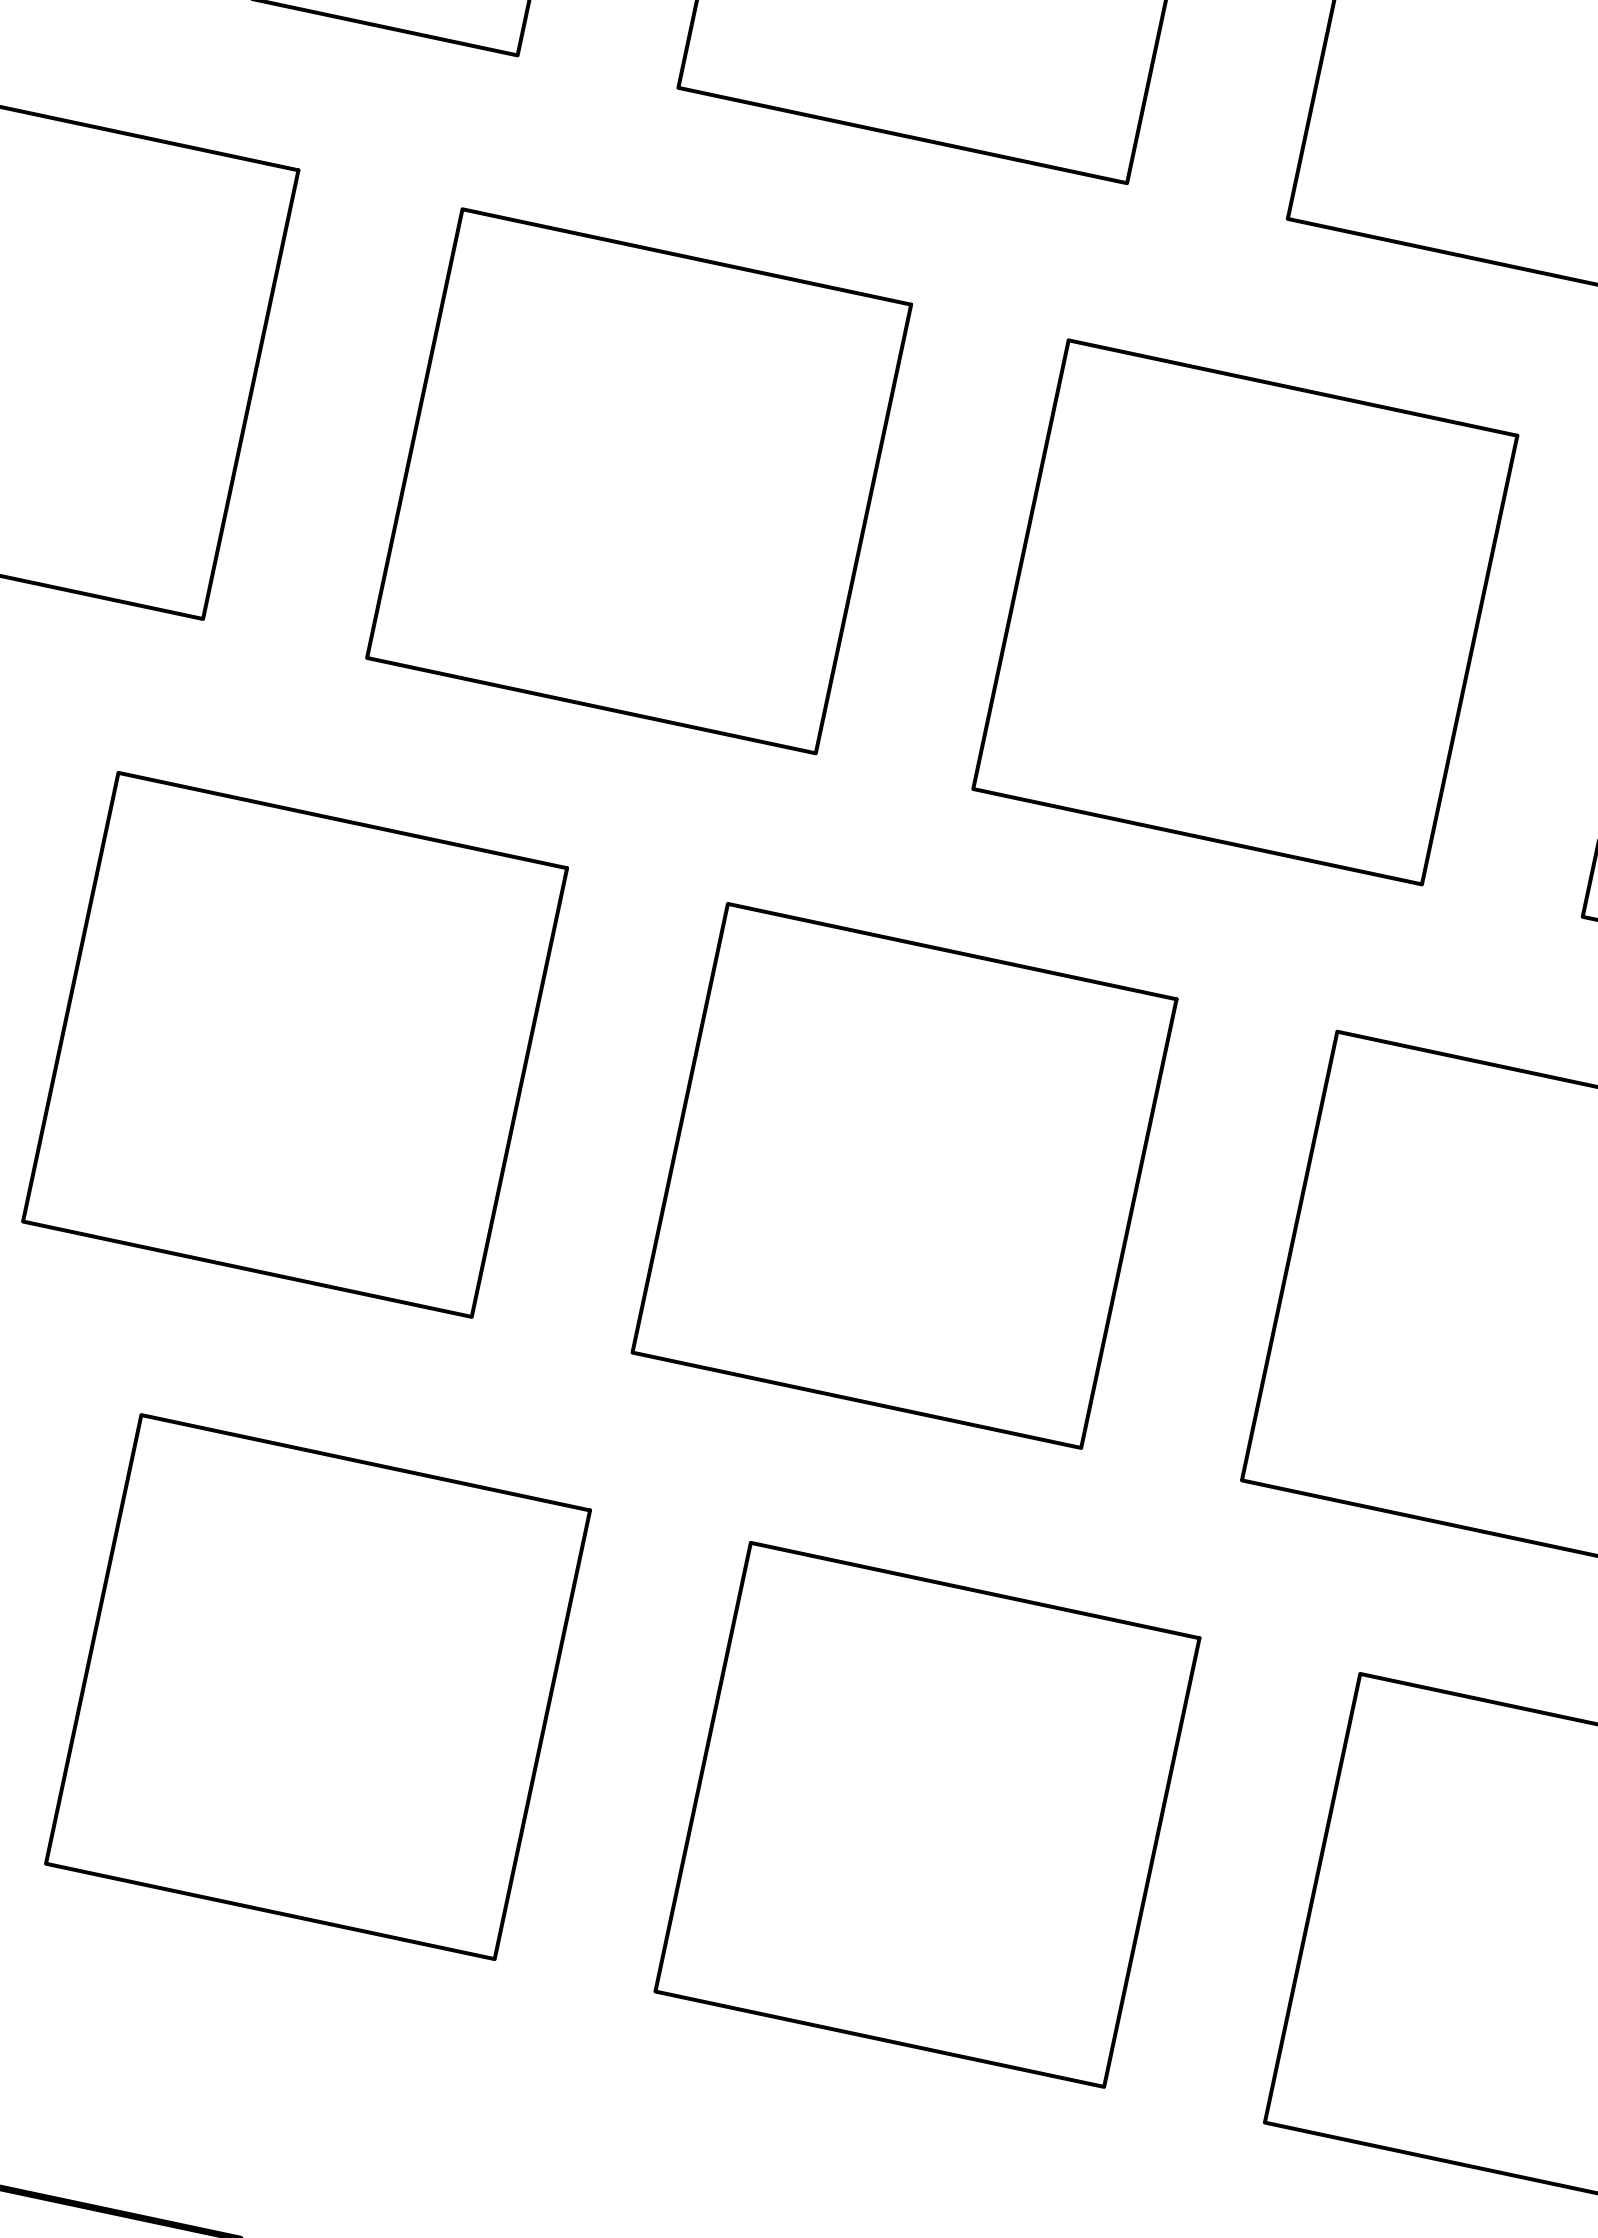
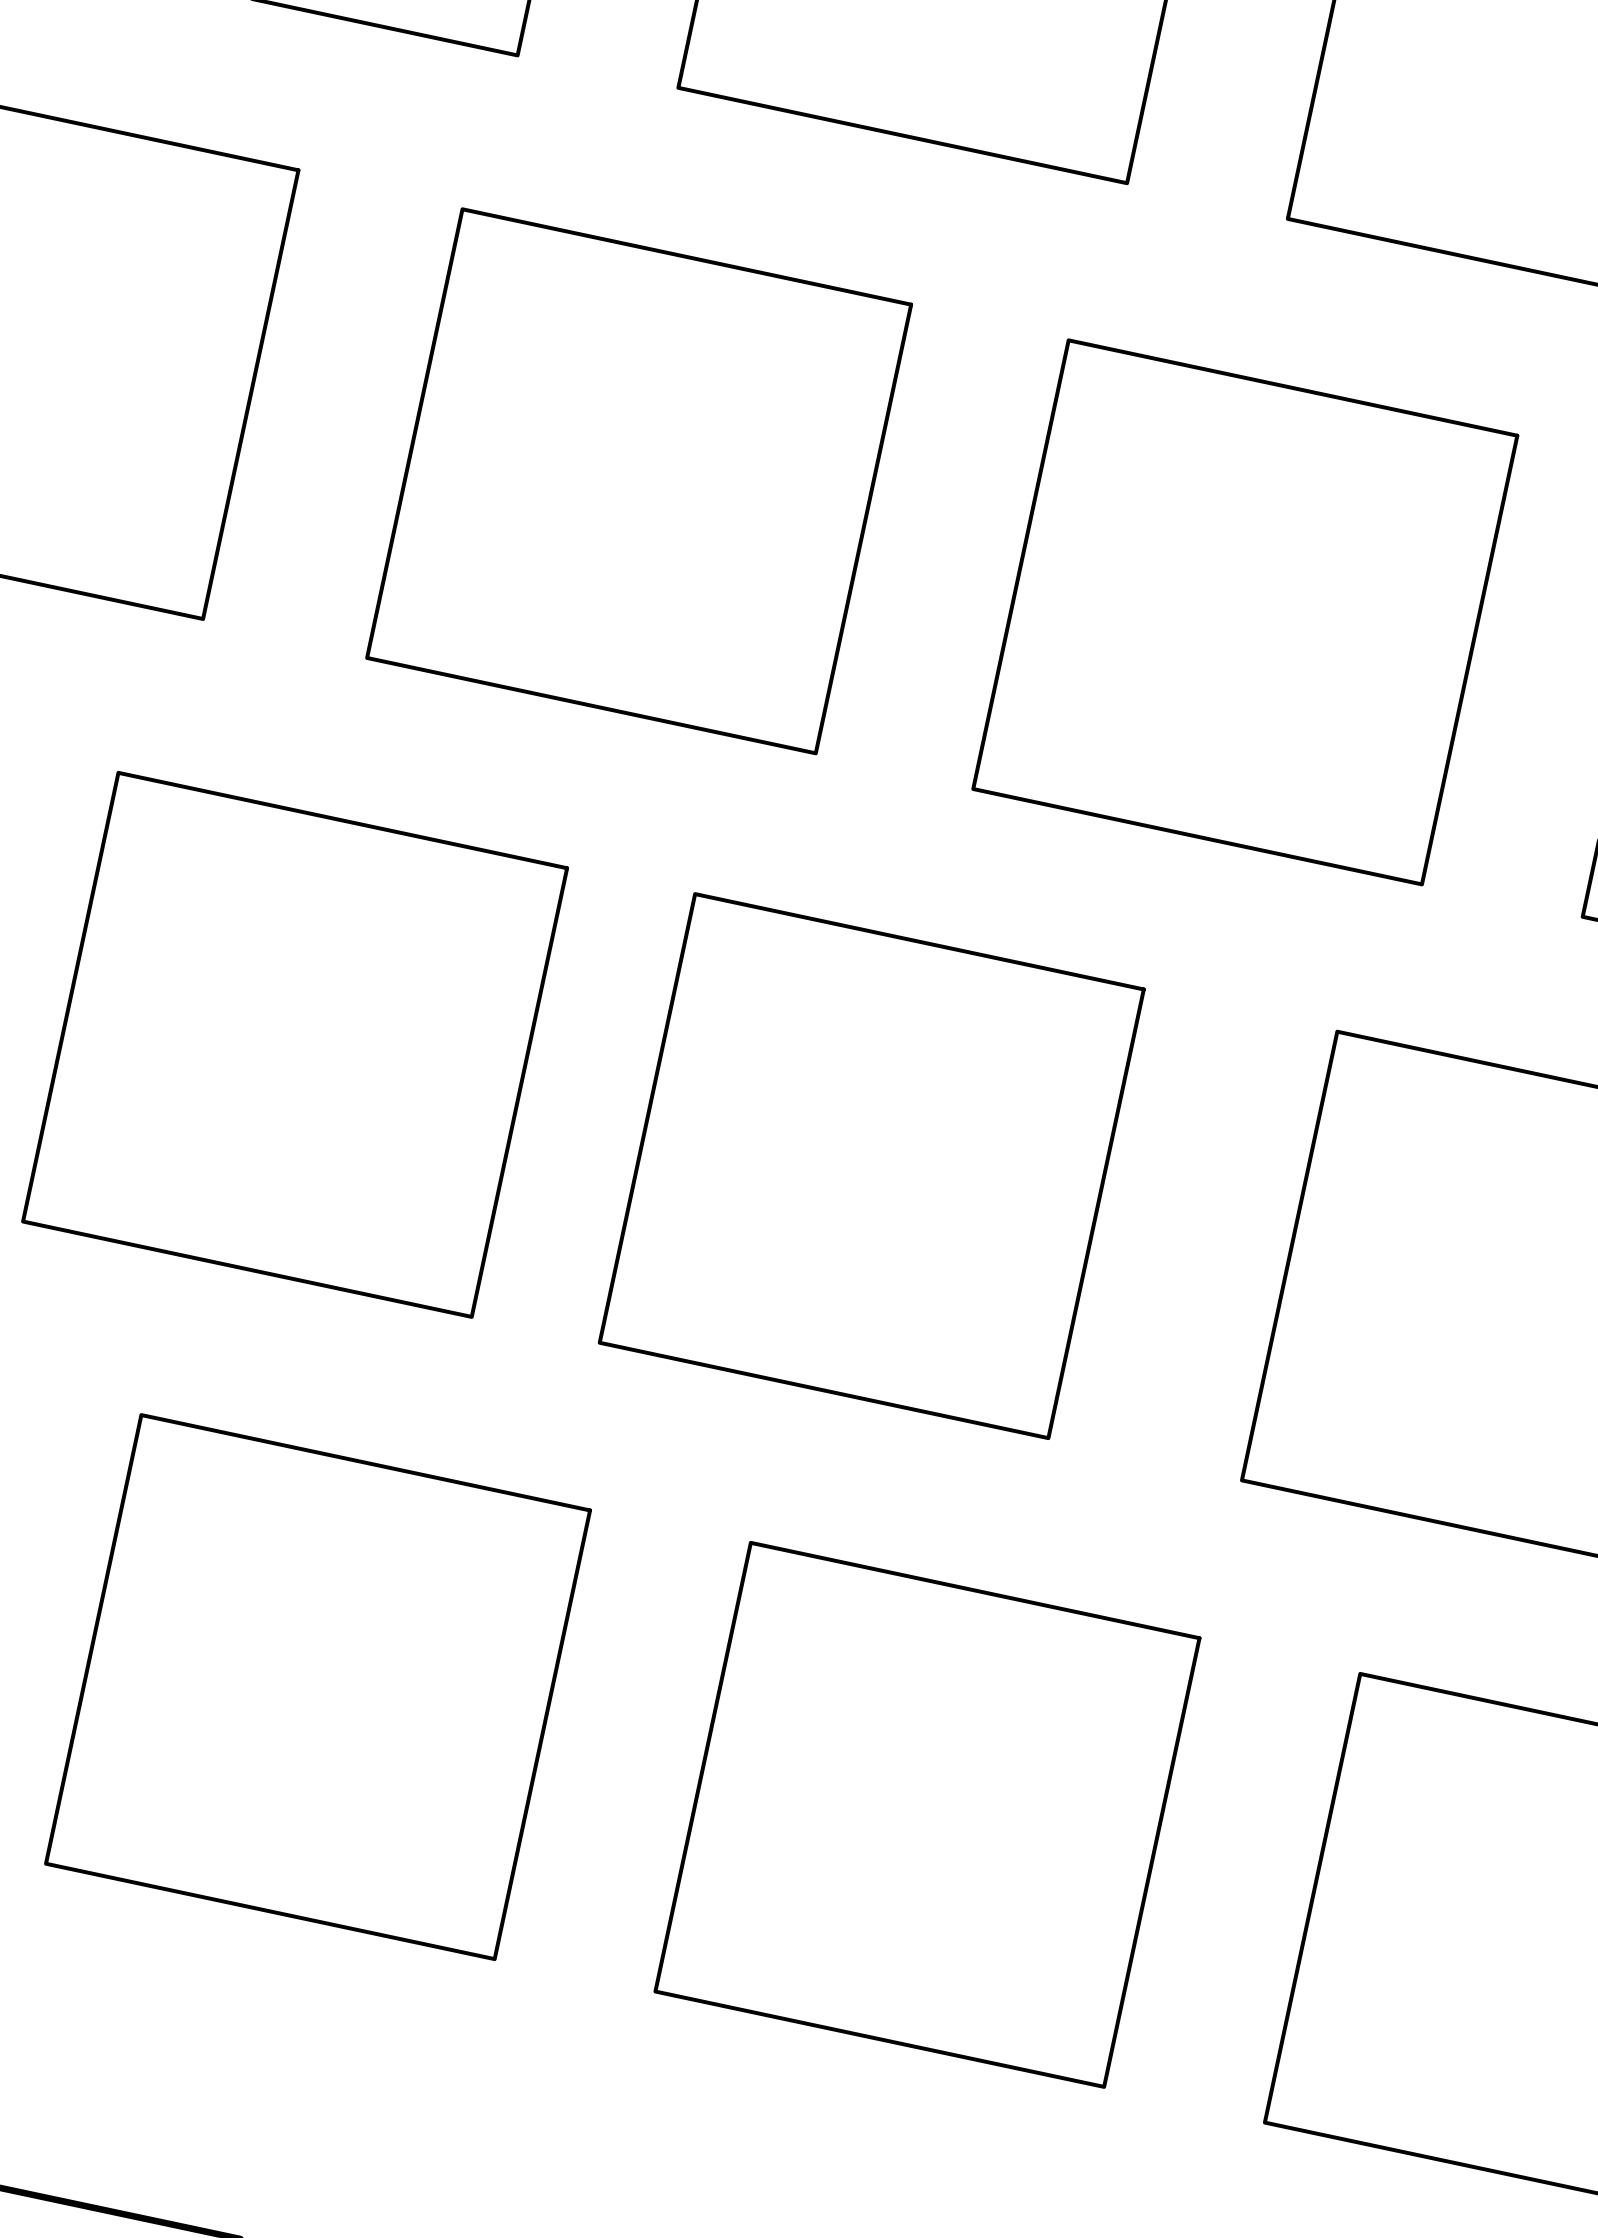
part position: (904, 1175) -> (871, 1166)

